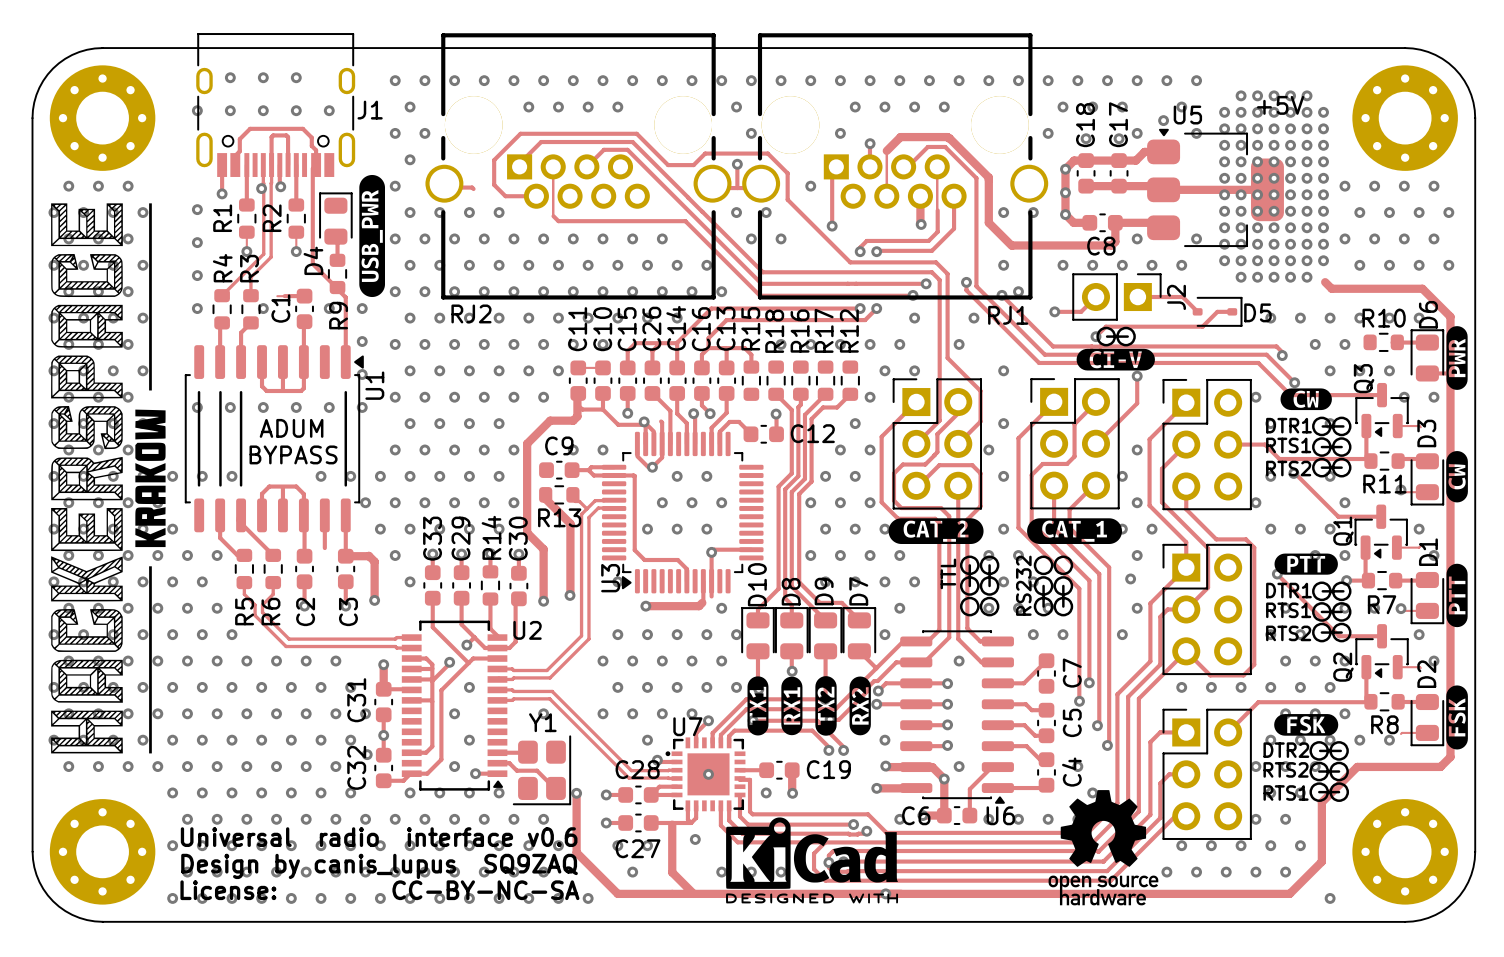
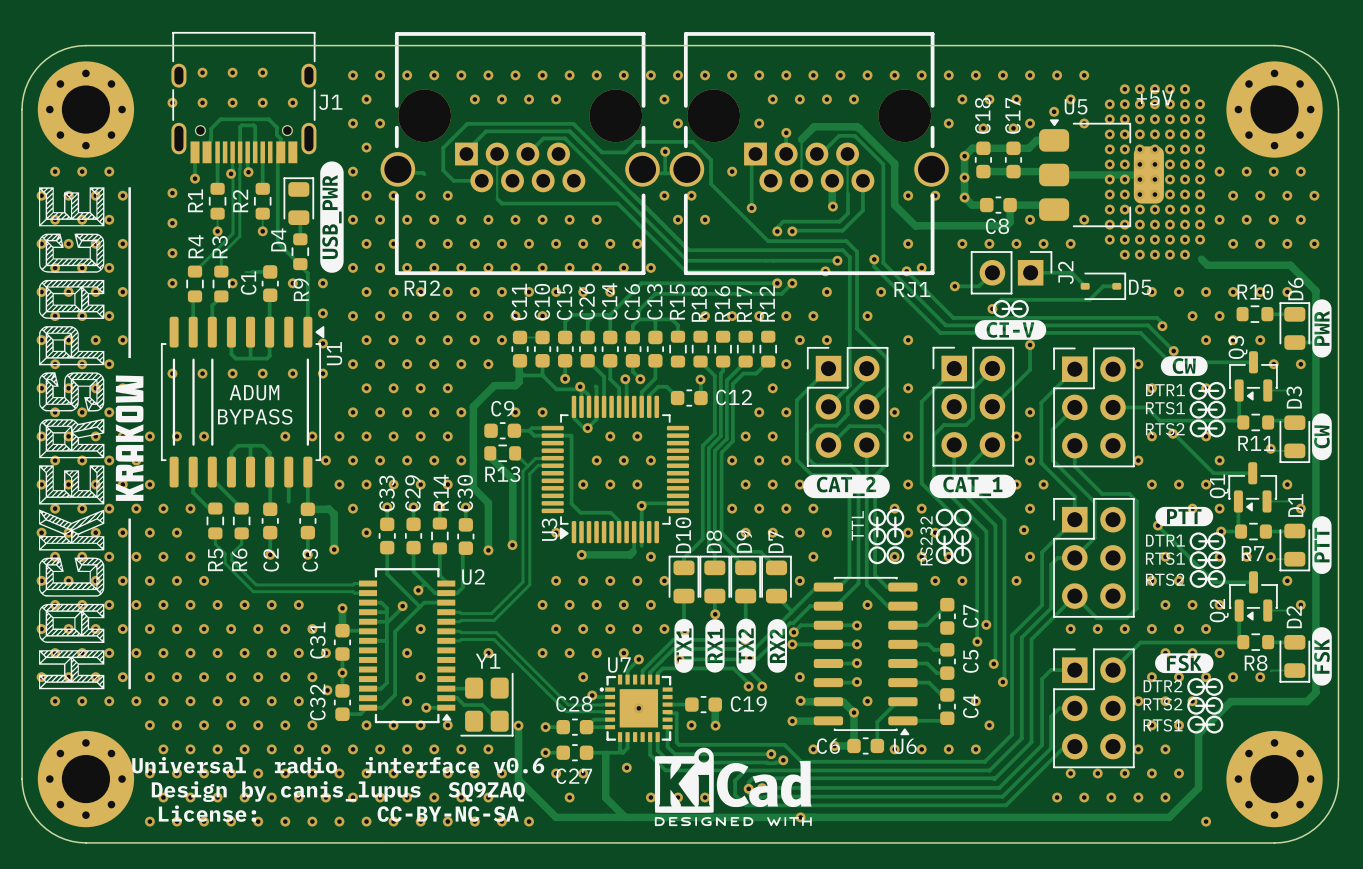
drawing: [1048, 790, 1159, 906] -> none

